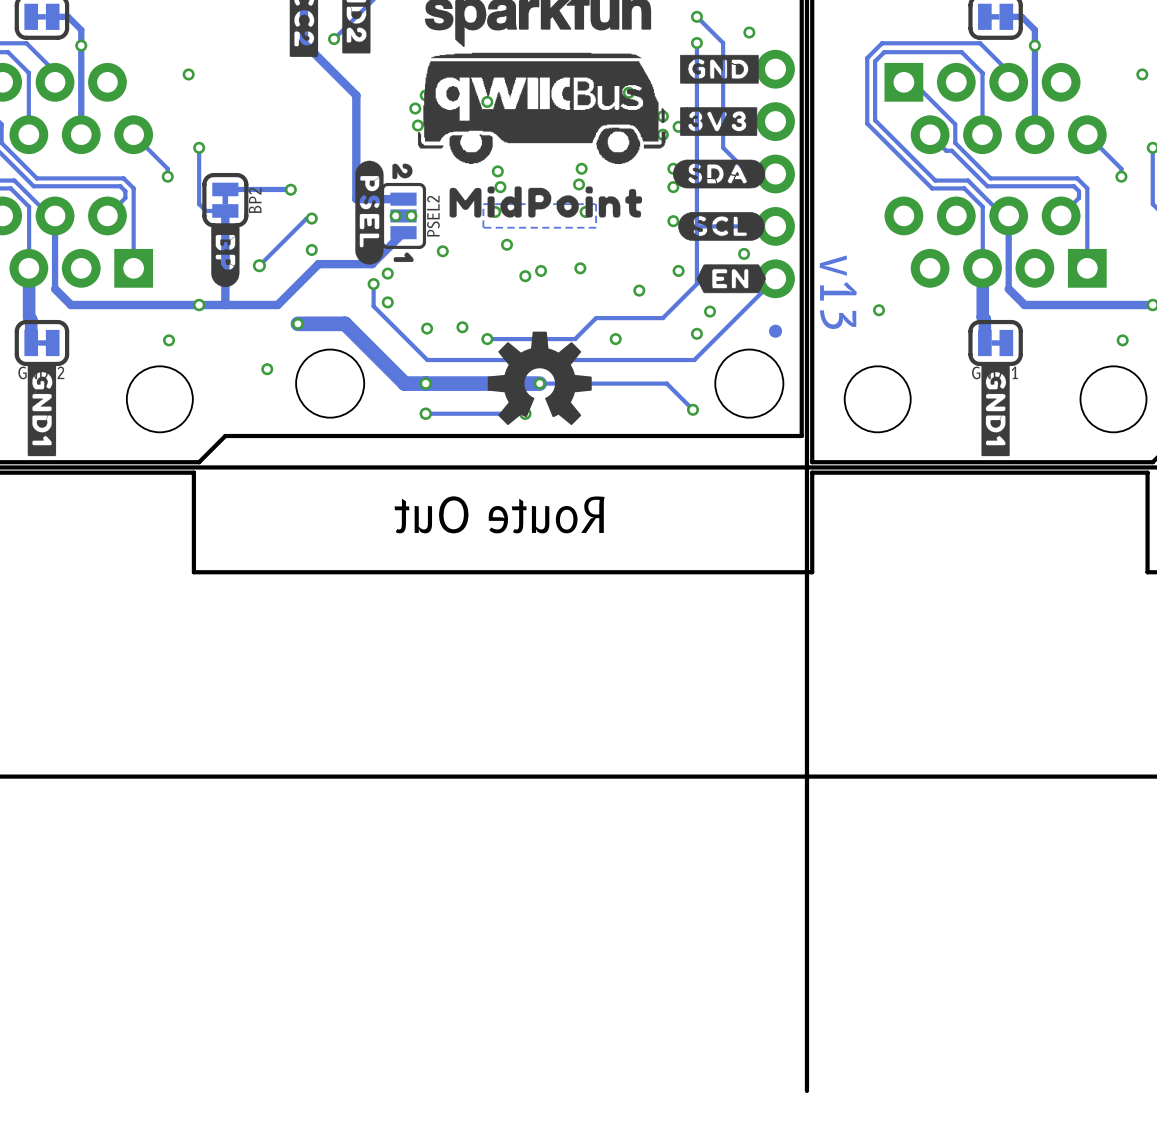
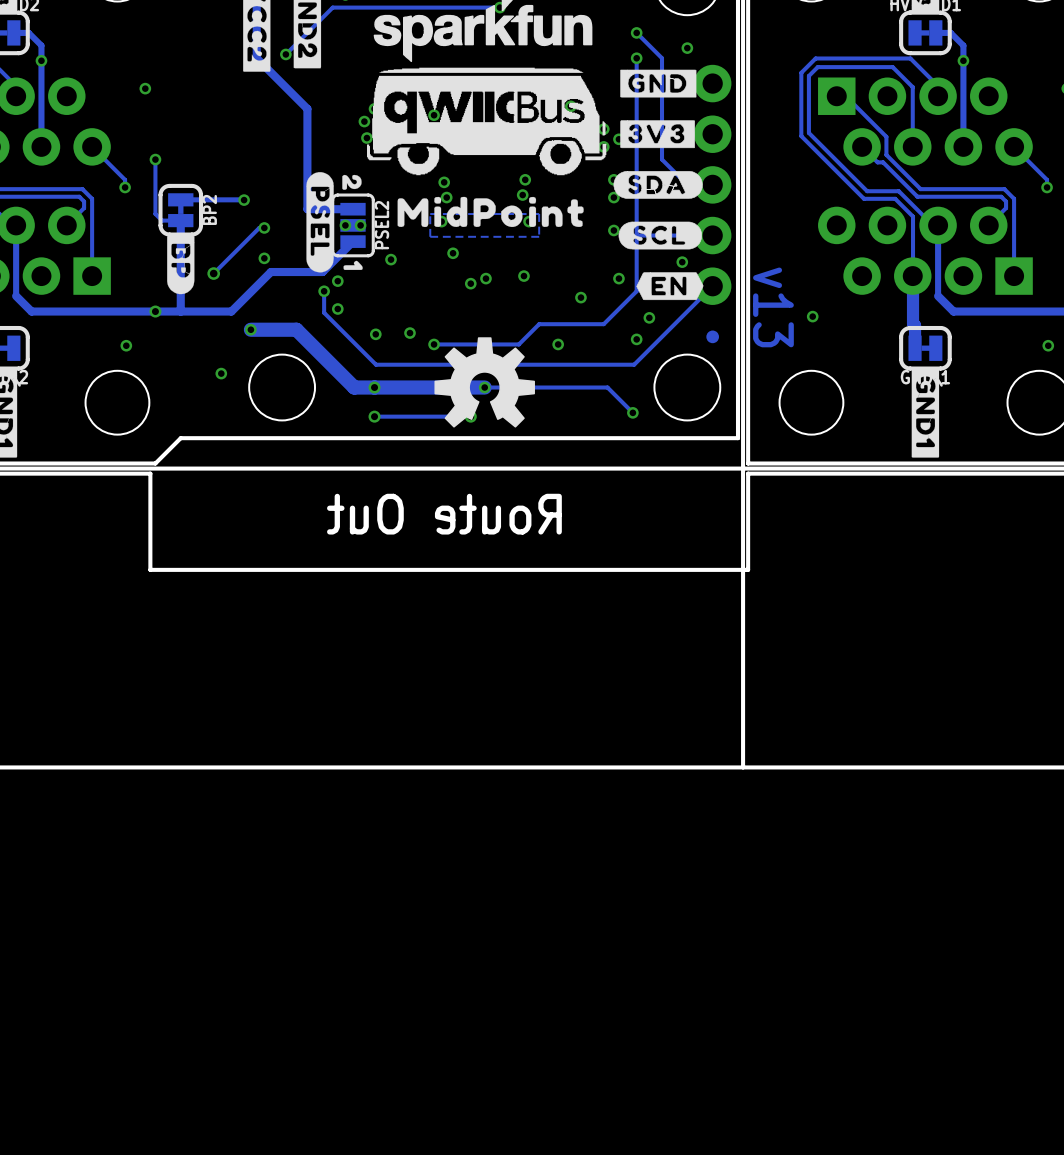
board edge: (806, 776) (806, 1090) -> none

